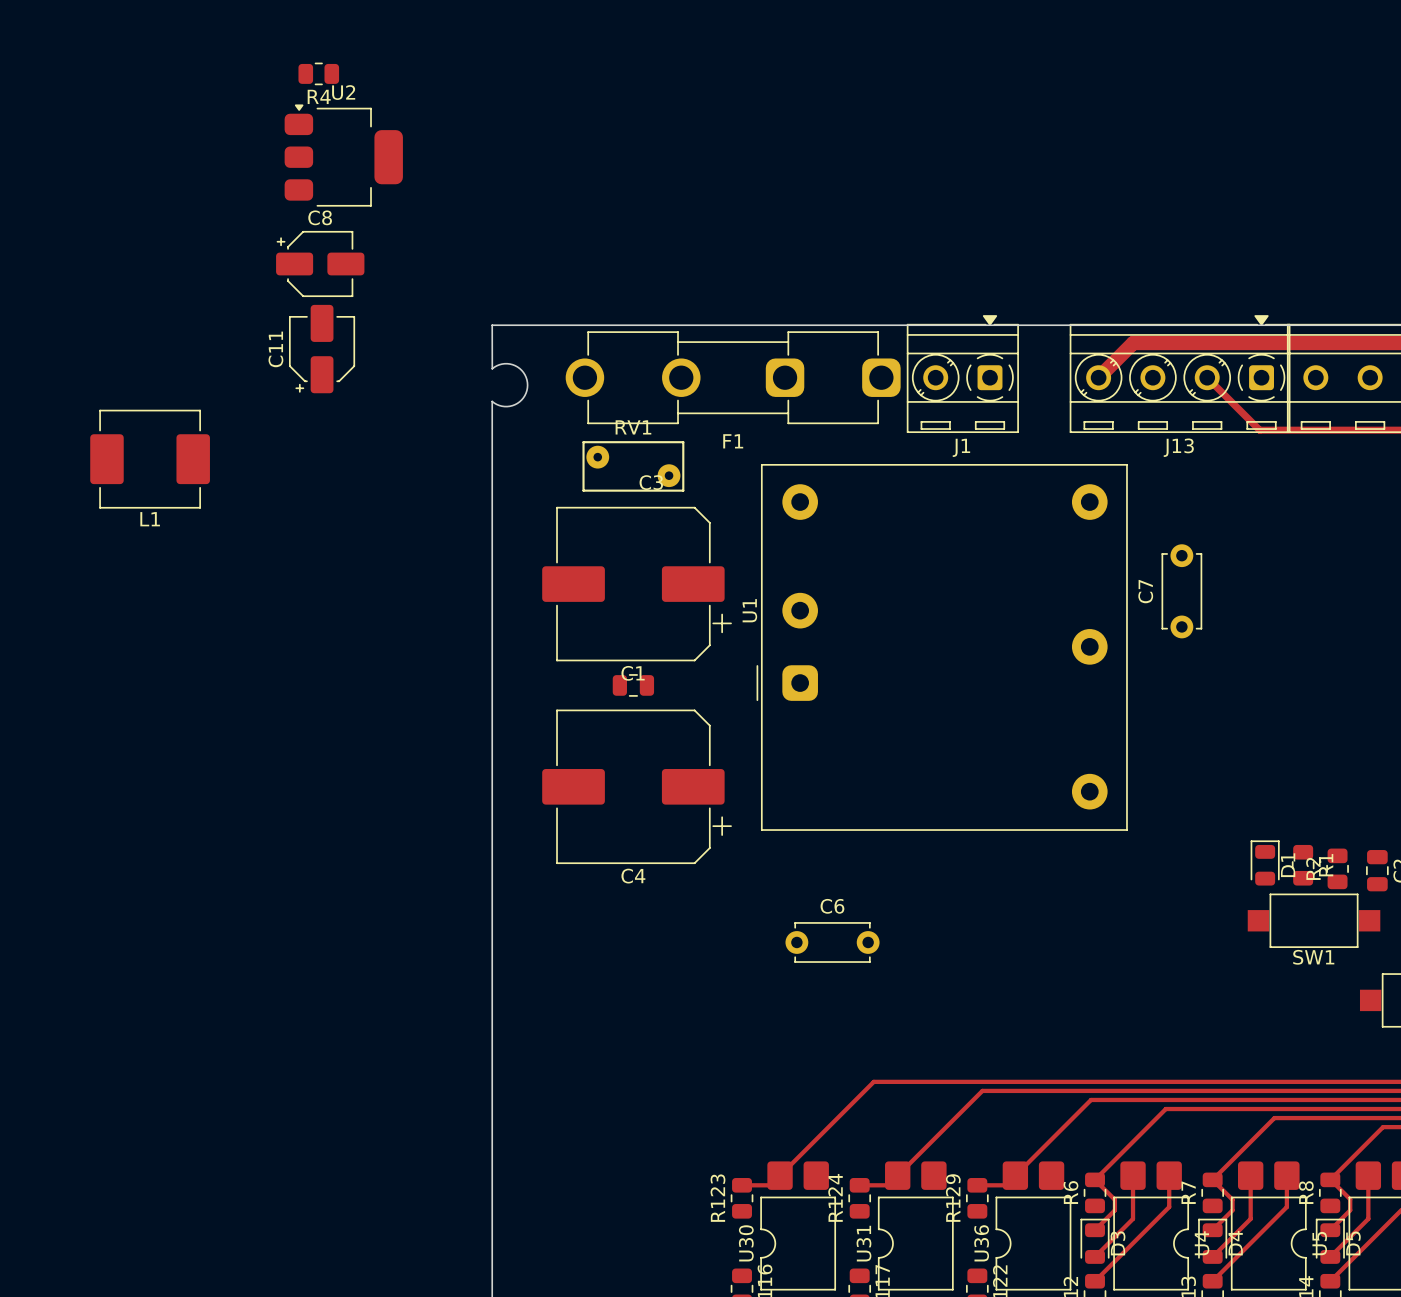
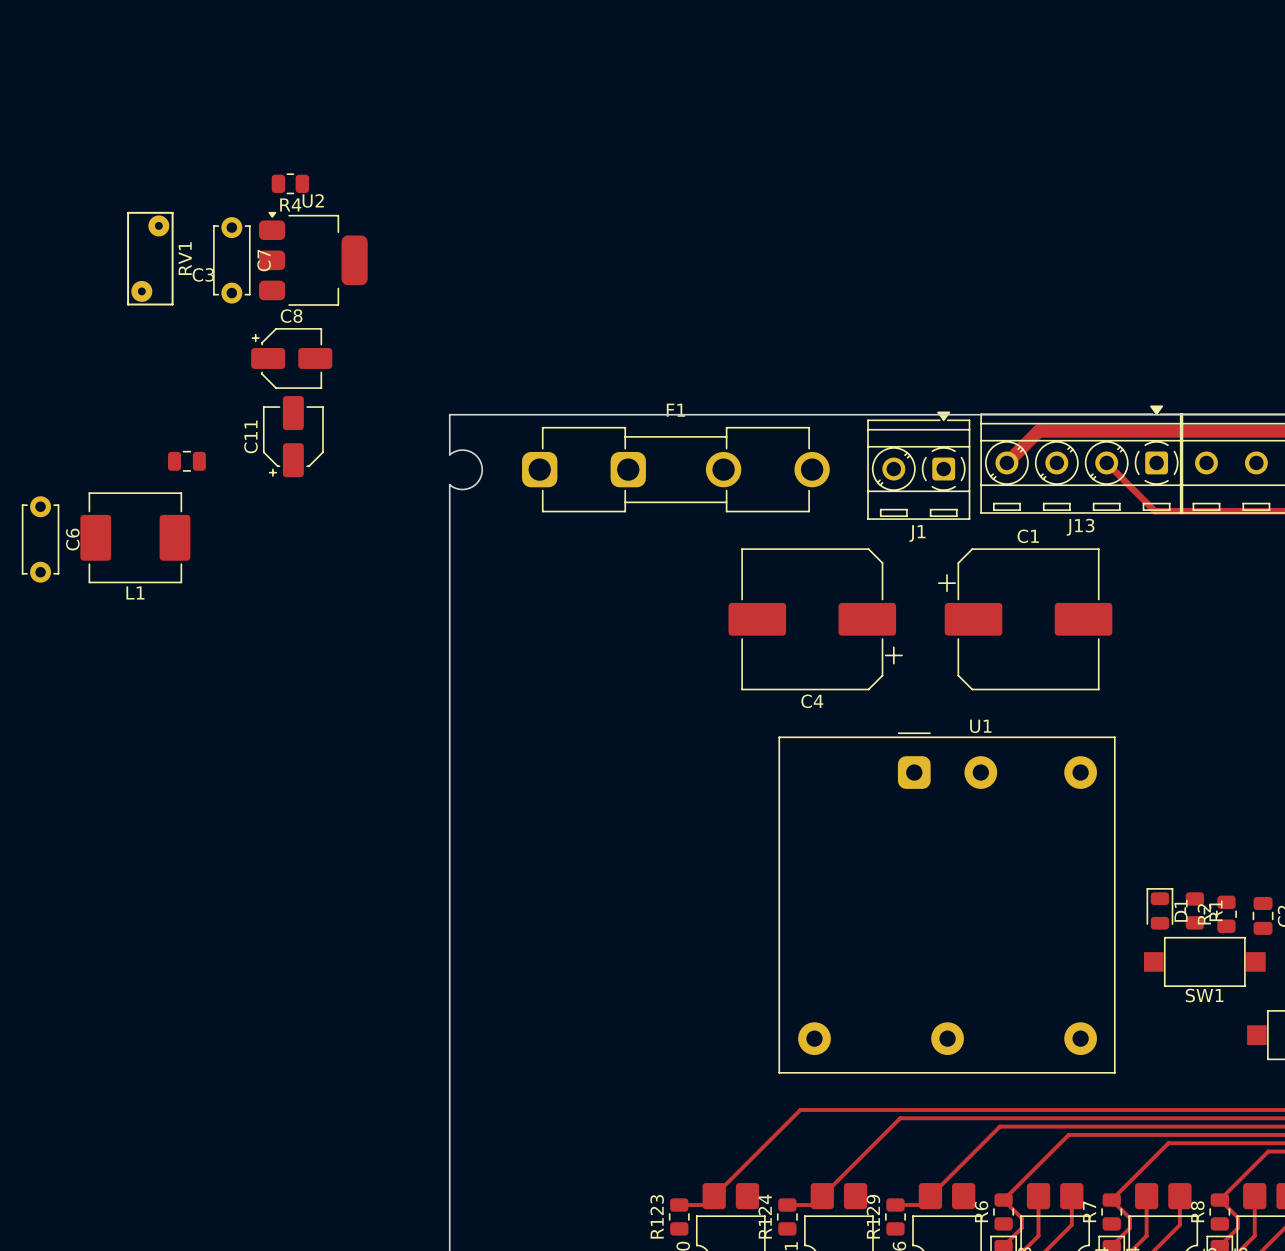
J1 position: (962, 374) -> (918, 465)
F1 rotation: 0° (733, 377) -> 180° (675, 469)
RV1 rotation: 0° (633, 466) -> 90° clockwise (150, 258)
RV1 position: (633, 466) -> (150, 258)
C1 rotation: 0° (637, 584) -> 180° (1025, 619)
C1 position: (637, 584) -> (1025, 619)
C7 name position: C7 (1145, 591) -> C7 (264, 260)
C7 position: (1181, 591) -> (231, 260)
U1 rotation: 0° (942, 647) -> 90° clockwise (947, 903)
U1 position: (942, 647) -> (947, 903)
C3 position: (633, 685) -> (186, 461)
C4 position: (637, 786) -> (815, 619)
C6 rotation: 0° (832, 942) -> 90° clockwise (40, 539)
C6 position: (832, 942) -> (40, 539)

